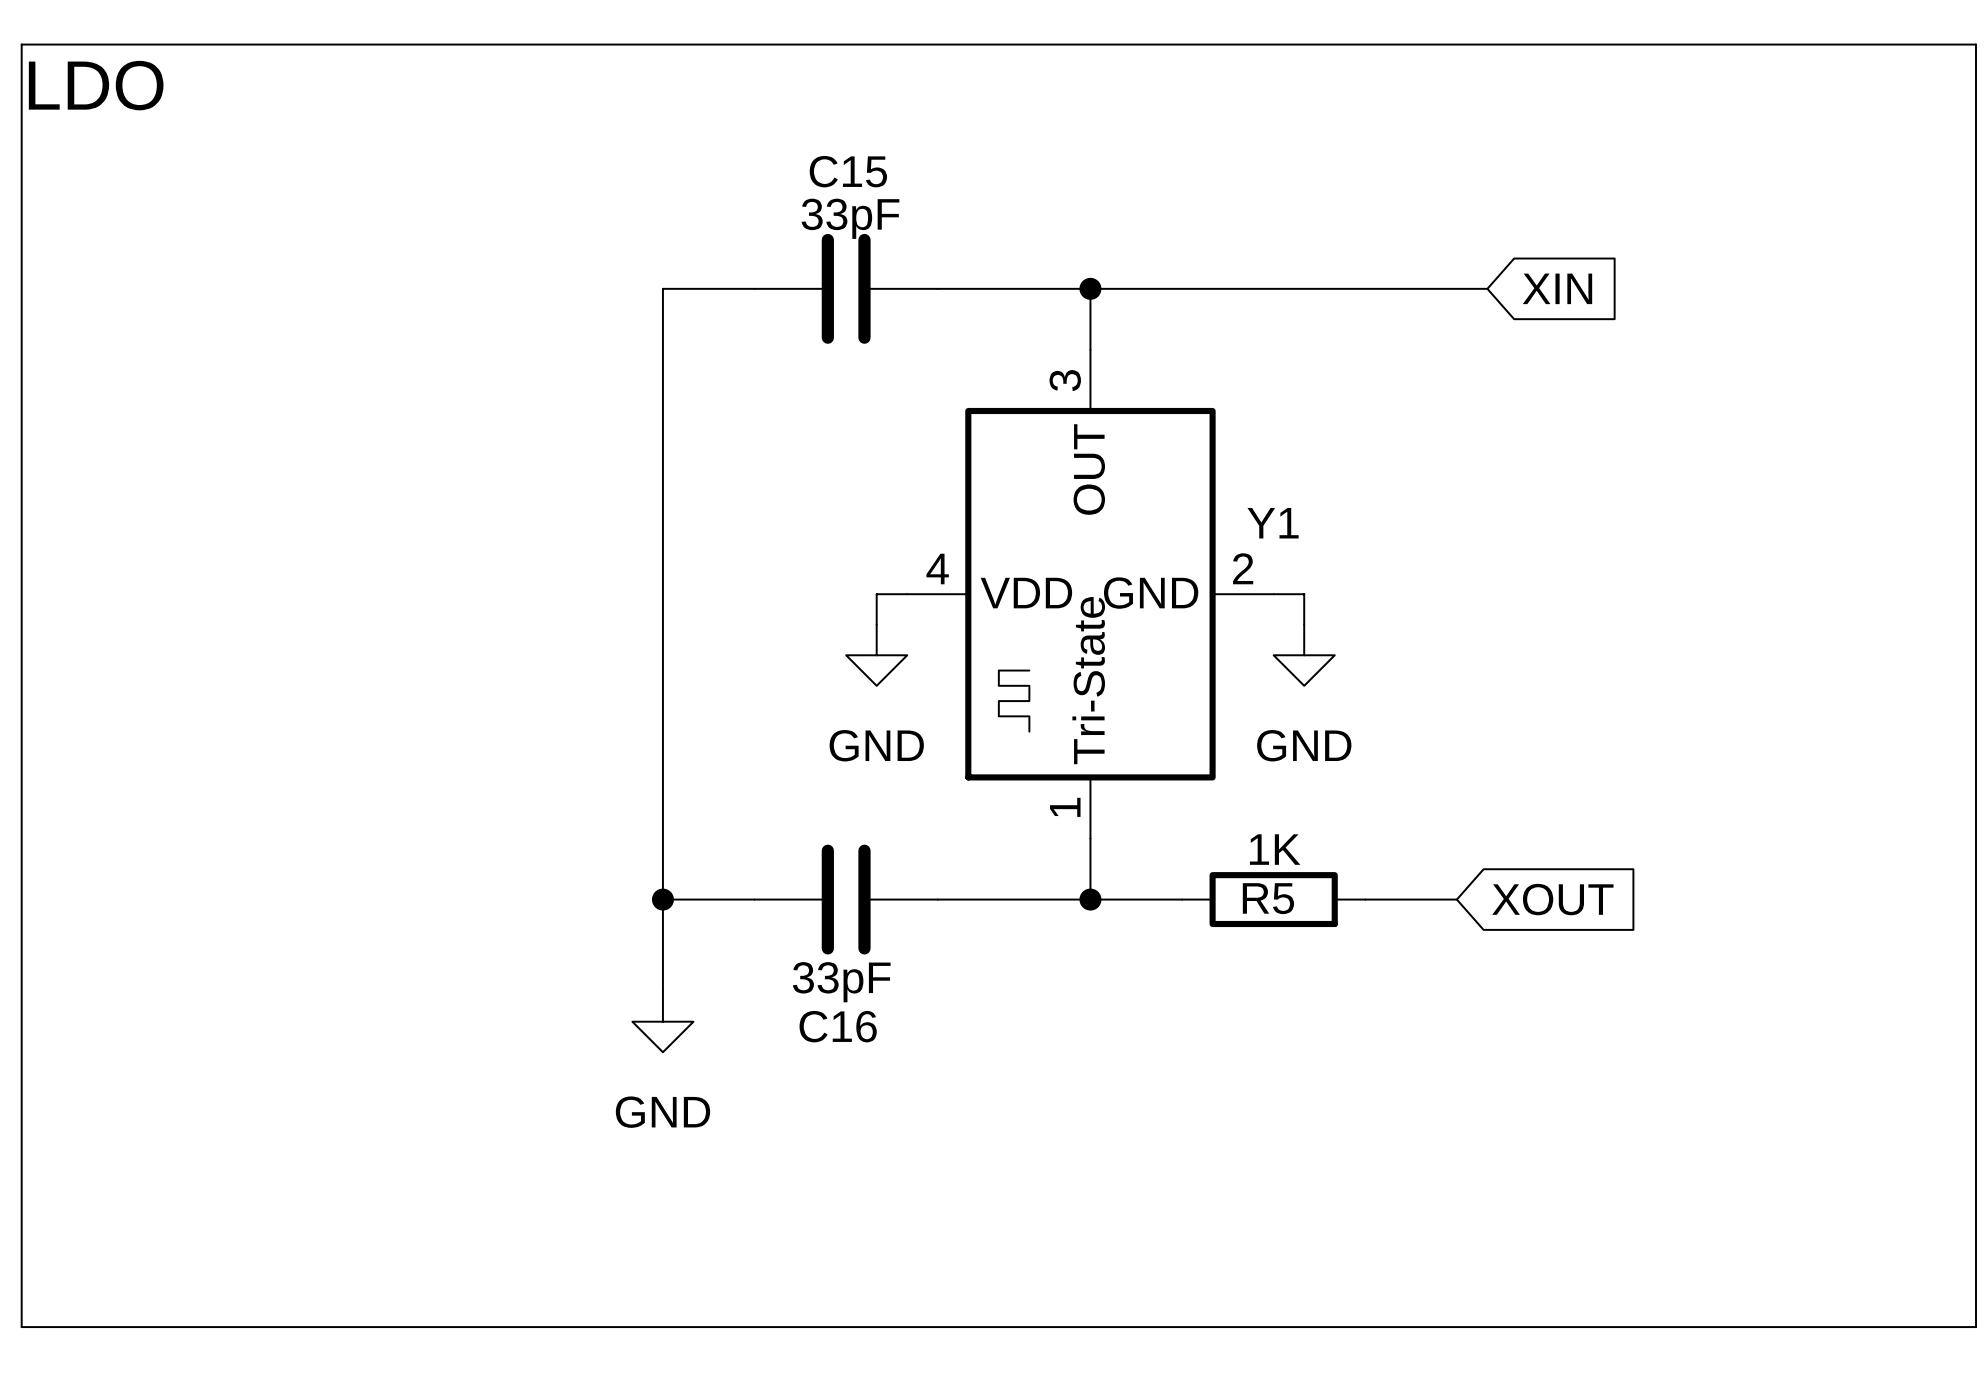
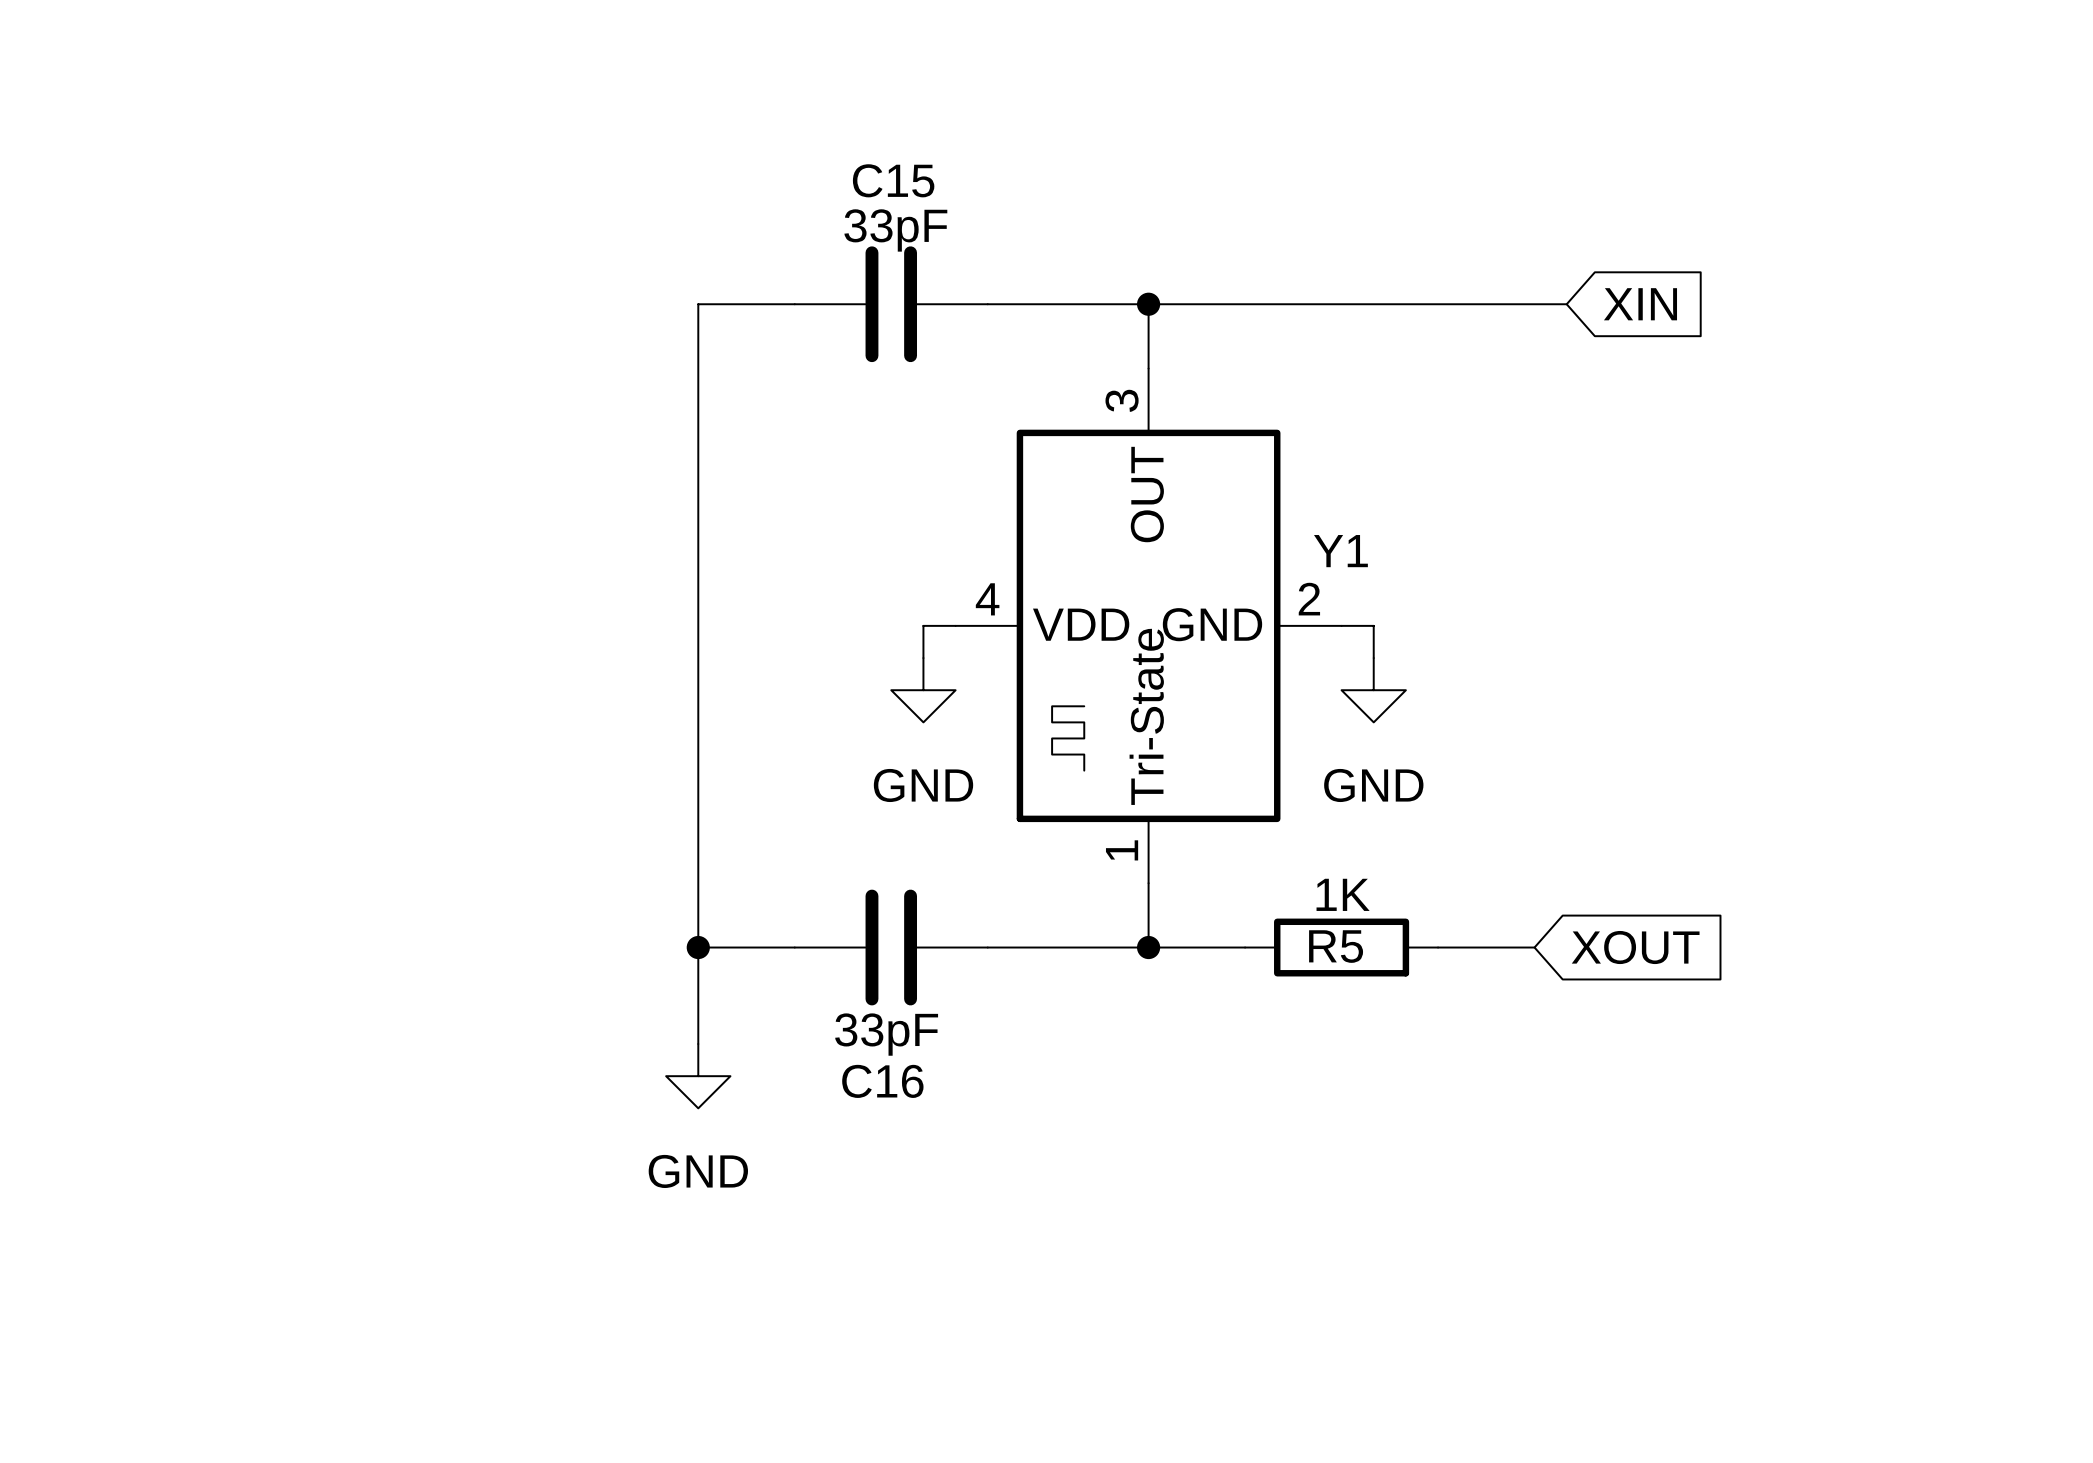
line: (21, 44) (1975, 44) (1975, 1327) (21, 1327) (21, 44) -> none
text: LDO (96, 85) -> none

